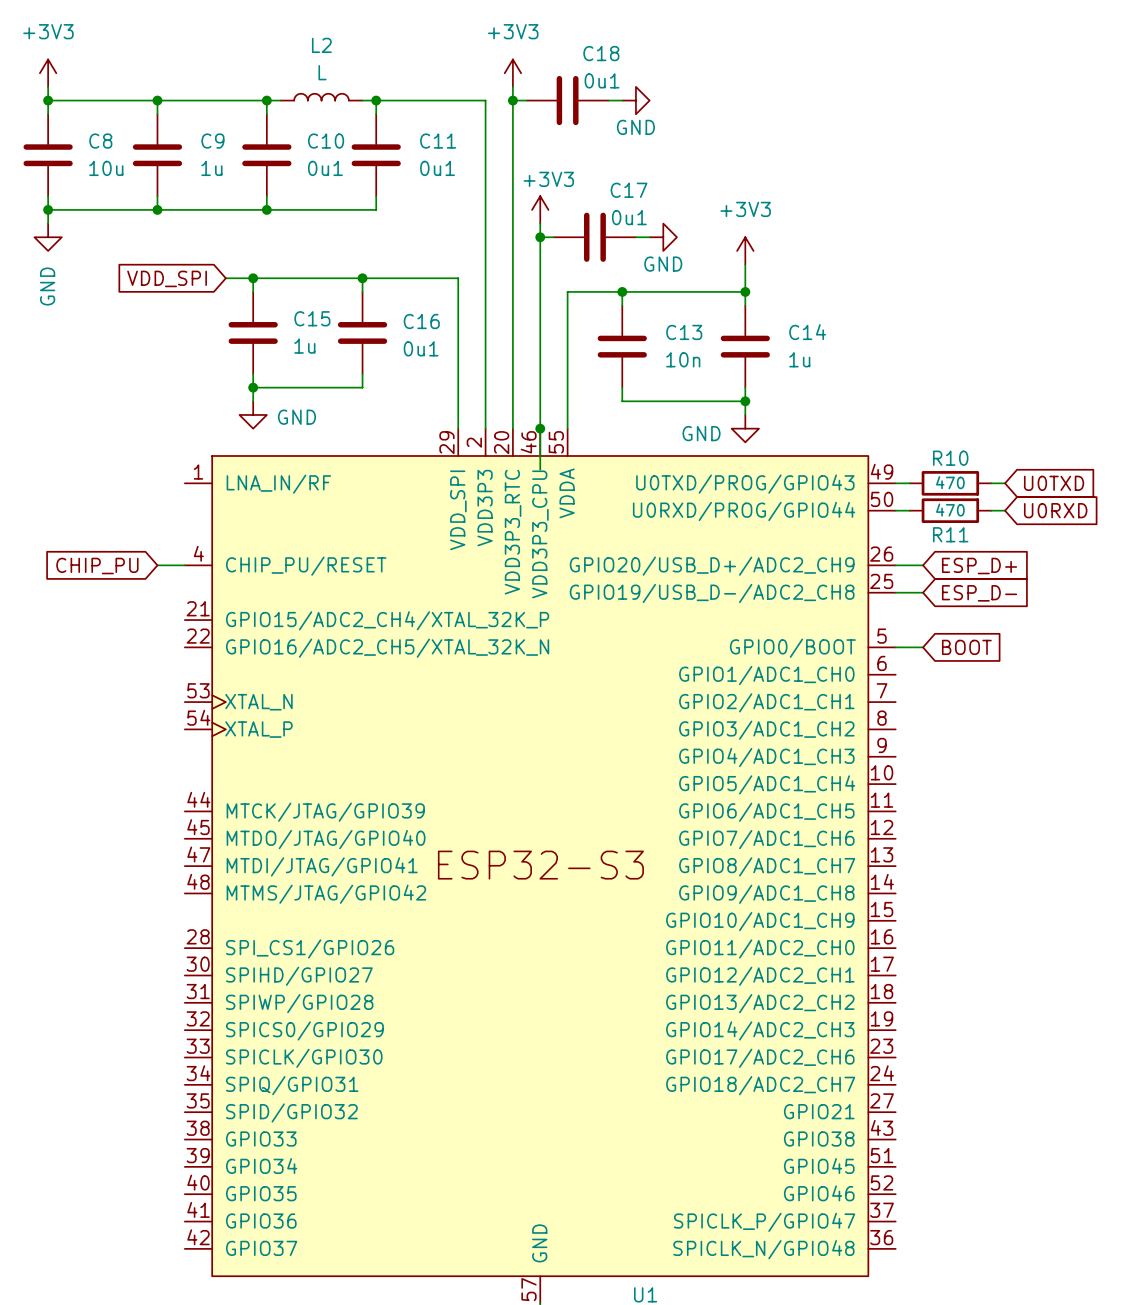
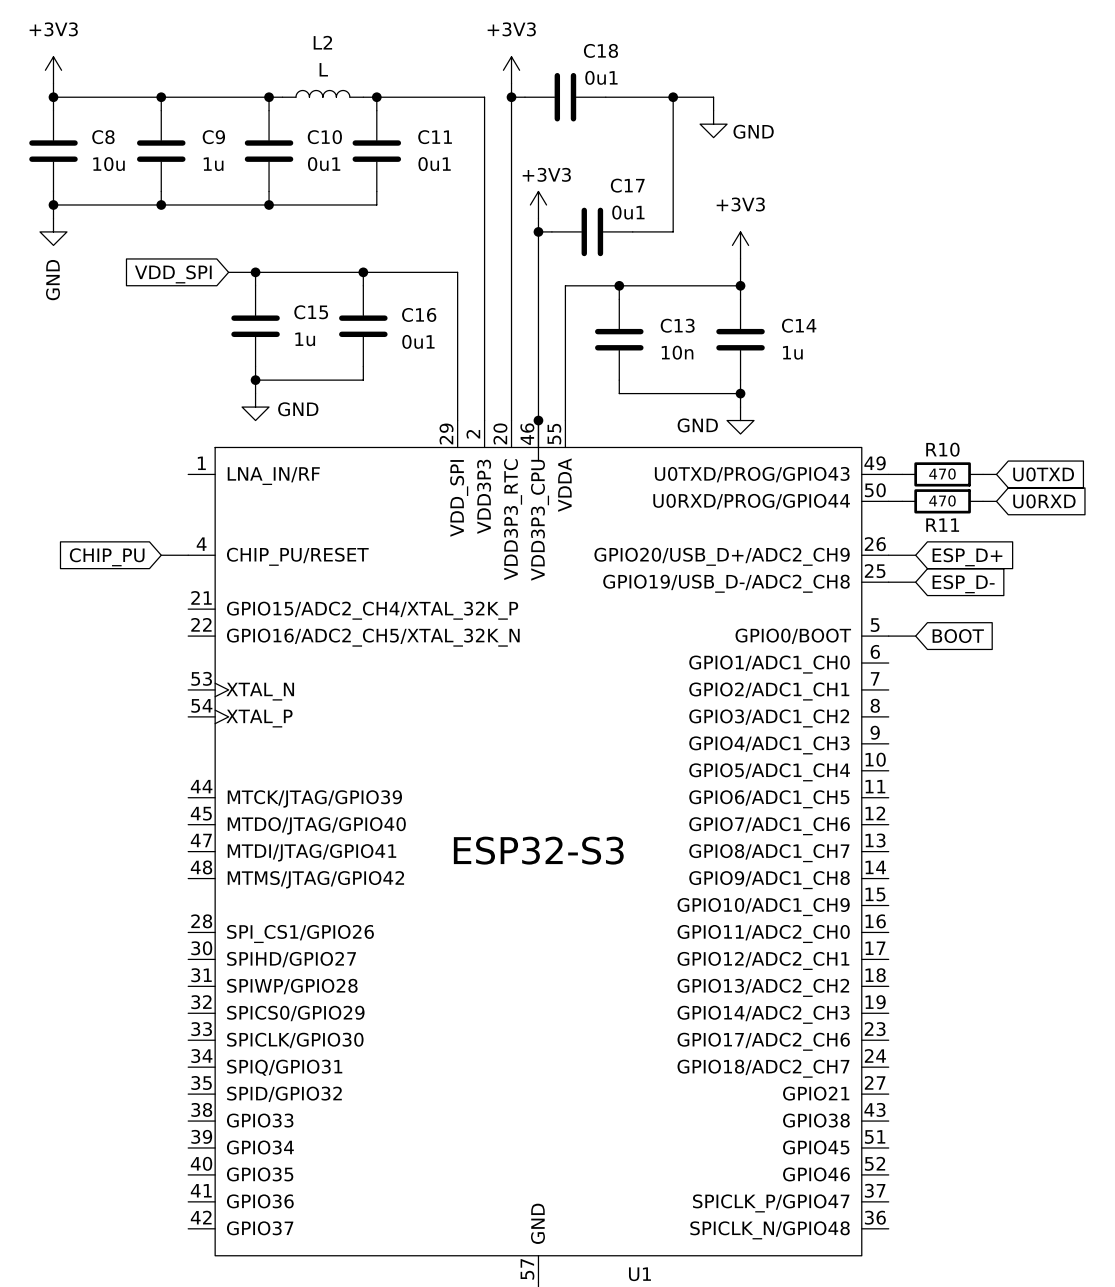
wire: none -> (619, 97) (713, 97) (713, 110)
power symbol: GND (635, 100) -> none
wire: none -> (673, 97) (673, 231) (646, 231)
junction: none -> (673, 97)
power symbol: none -> GND (713, 124)
power symbol: GND (663, 237) -> none

